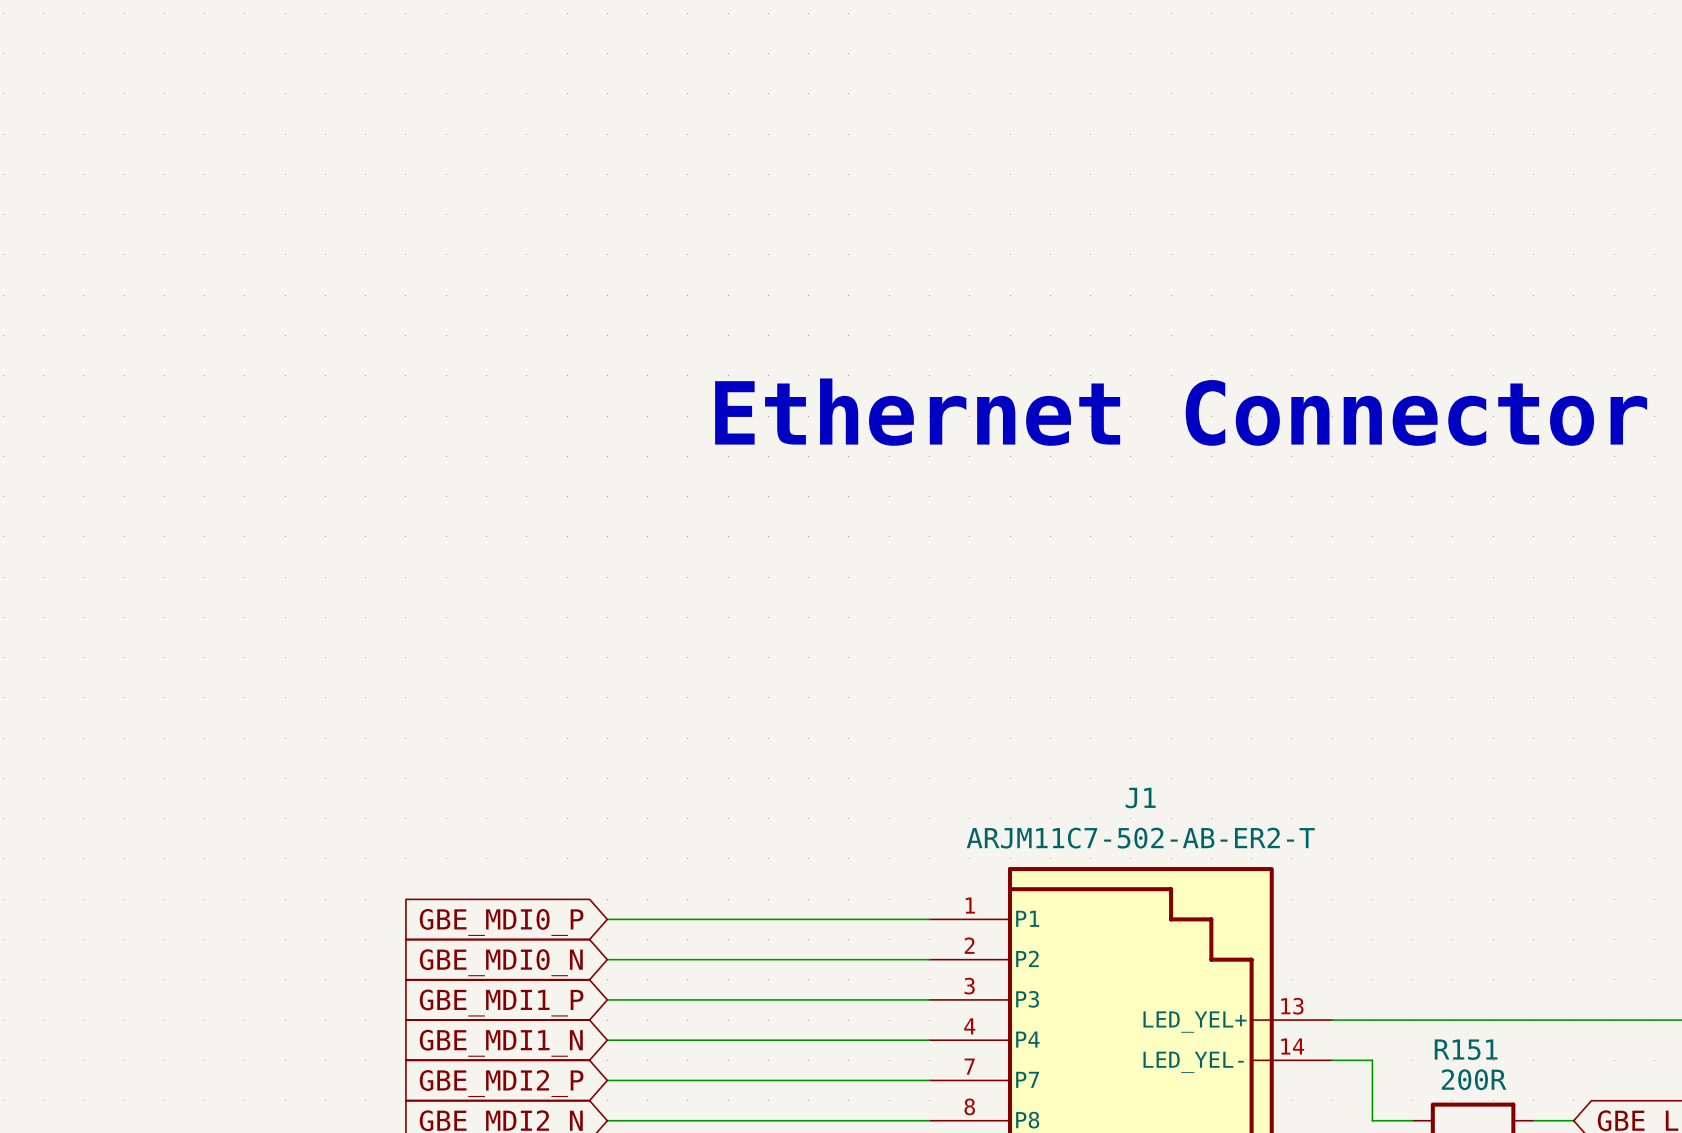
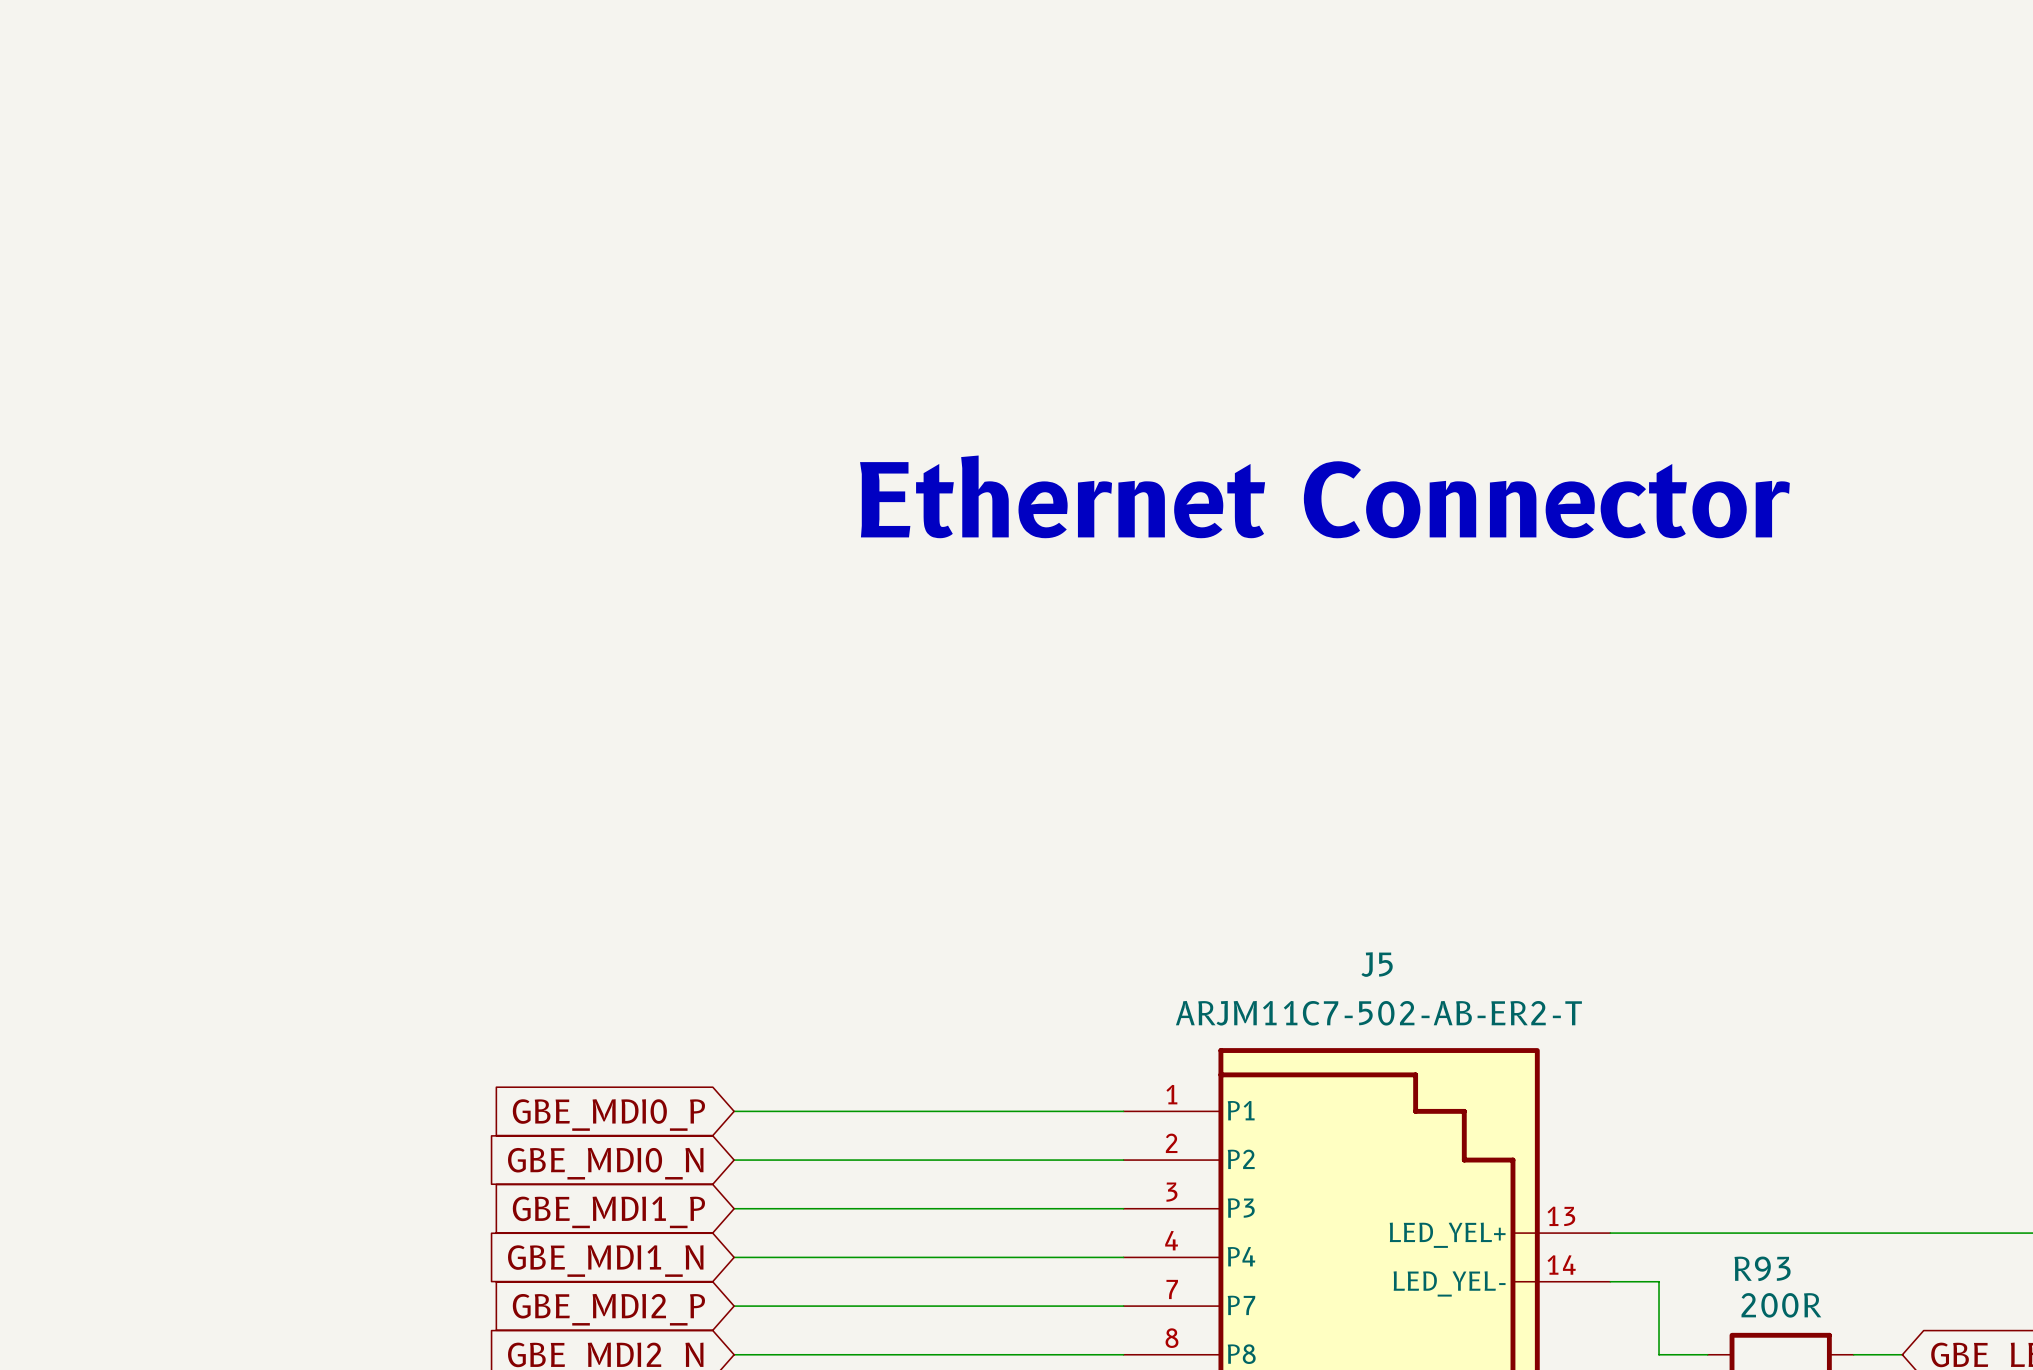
J1 name: J1 (1140, 798) -> J5 (1377, 964)
R151 name: R151 (1466, 1049) -> R93 (1762, 1268)

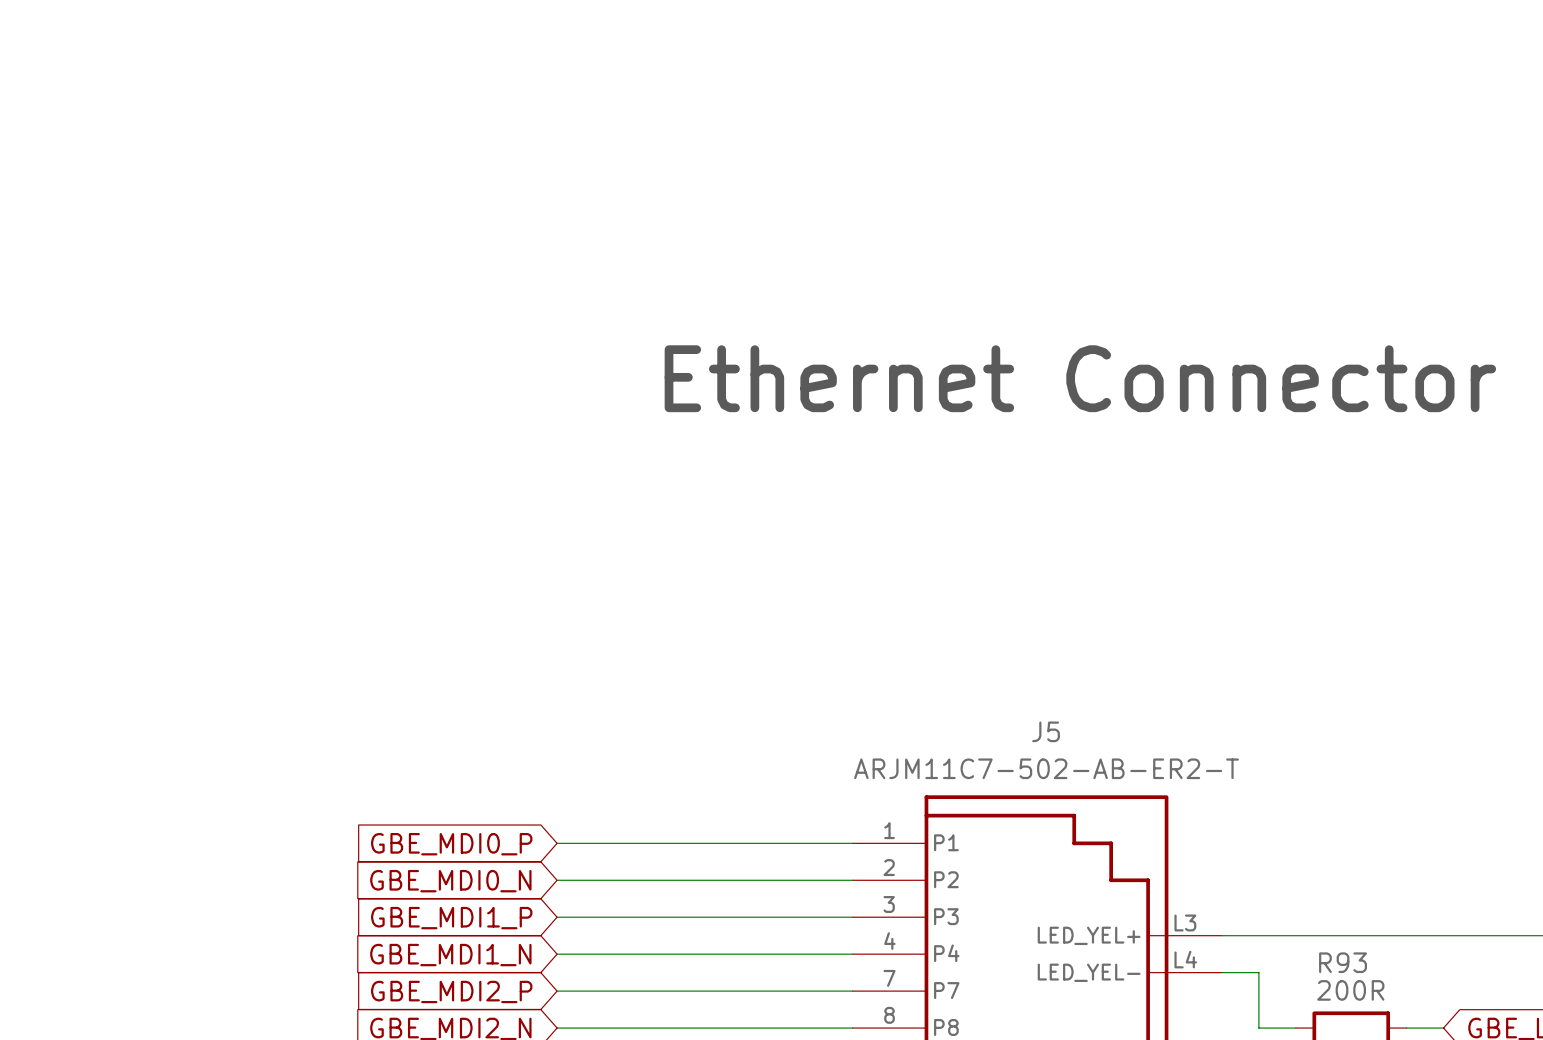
J5 pin number: 13 (1561, 1216) -> L3 (1185, 922)
J5 pin number: 14 (1561, 1265) -> L4 (1185, 959)

